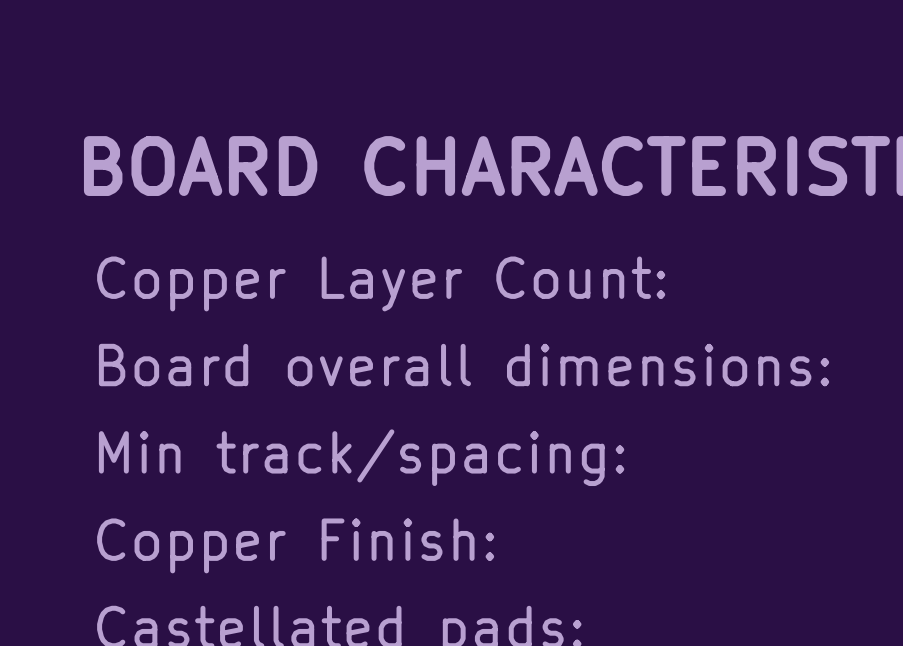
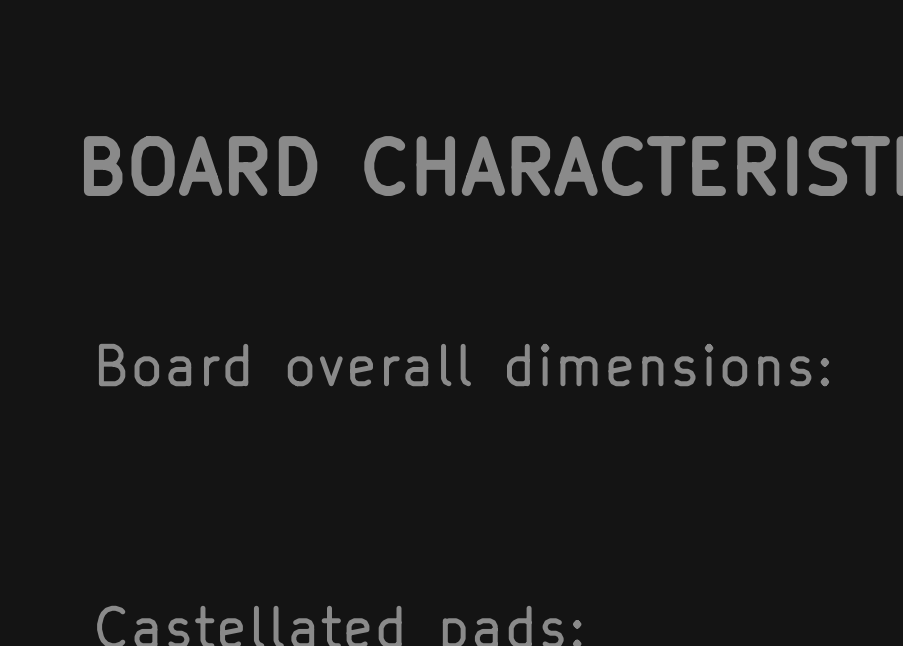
text: Copper Layer Count: (381, 283) -> none
text: Min track/spacing: (361, 457) -> none
text: Copper Finish: (295, 545) -> none

